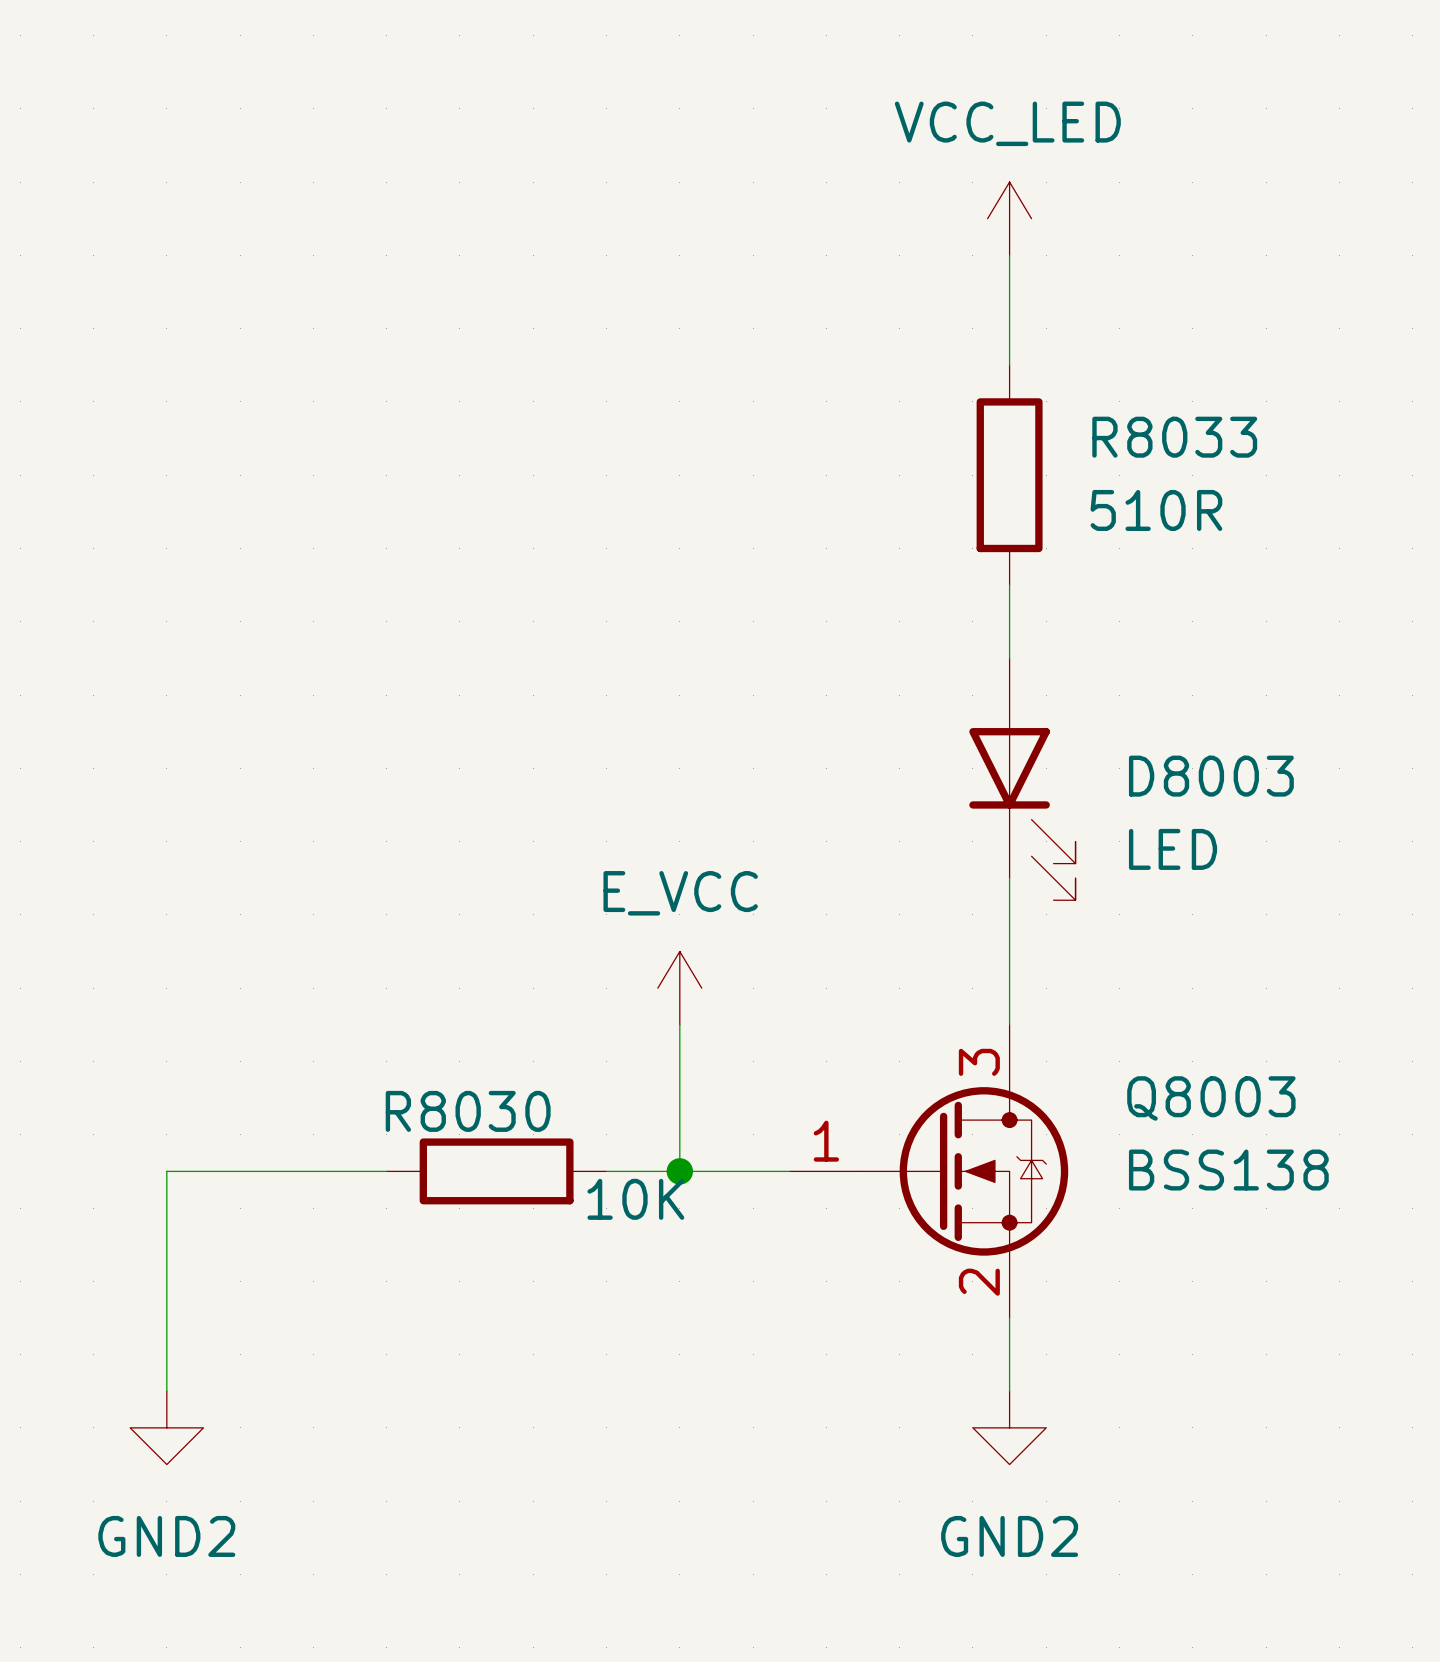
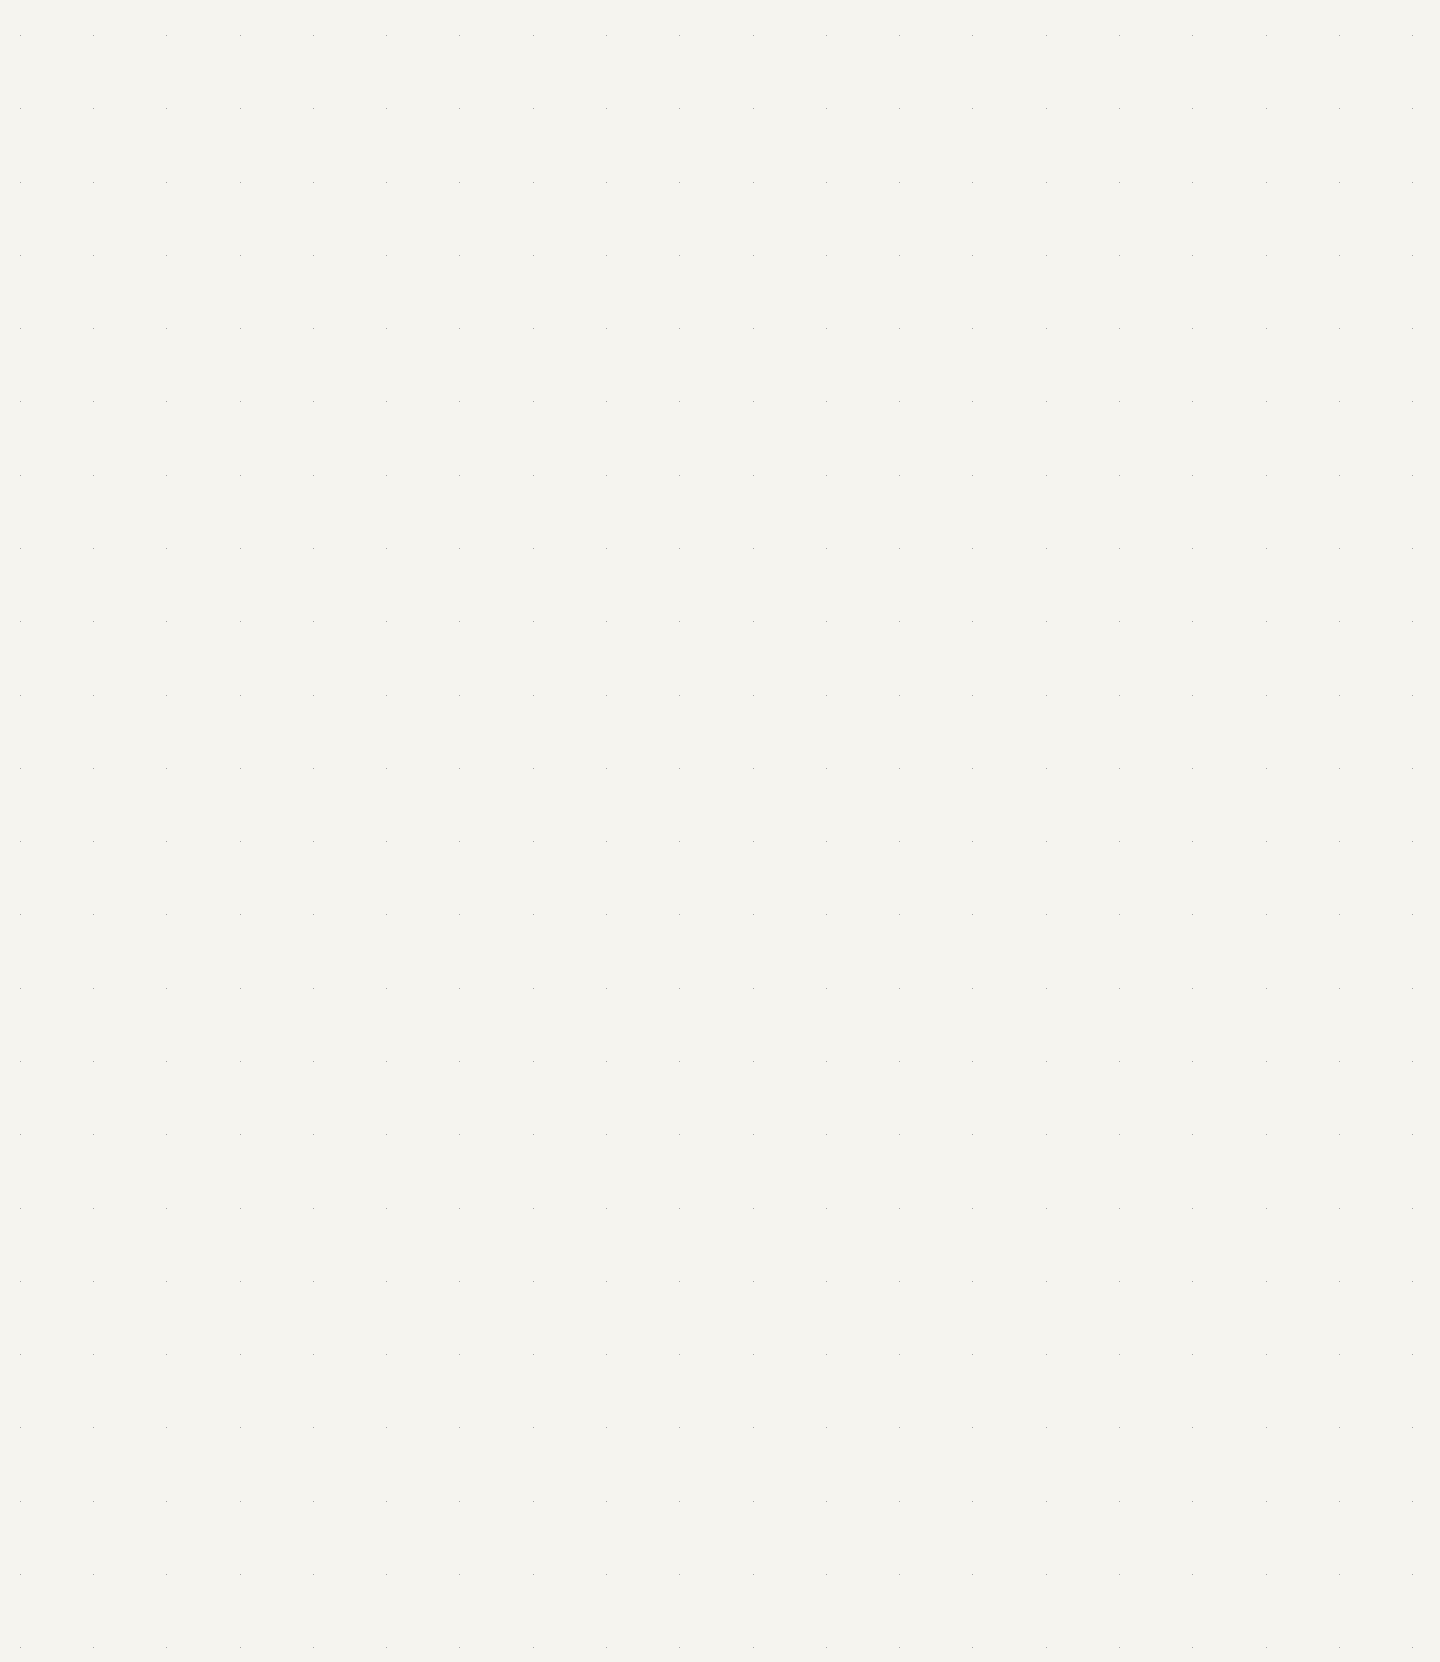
power symbol: VCC_LED (1009, 218) -> none
wire: (1009, 255) (1009, 365) -> none
R8033: 510R (1009, 475) -> none
wire: (1009, 585) (1009, 658) -> none
D8003: LED (1022, 779) -> none
wire: (1009, 878) (1009, 1024) -> none
power symbol: E_VCC (679, 988) -> none
wire: (679, 1024) (679, 1171) -> none
wire: (386, 1171) (166, 1171) (166, 1391) -> none
R8030: 10K (496, 1171) -> none
wire: (606, 1171) (789, 1171) -> none
junction: (679, 1171) -> none
Q8003: BSS138 (928, 1171) -> none
wire: (1009, 1317) (1009, 1391) -> none
power symbol: GND2 (166, 1427) -> none
power symbol: GND2 (1009, 1427) -> none

